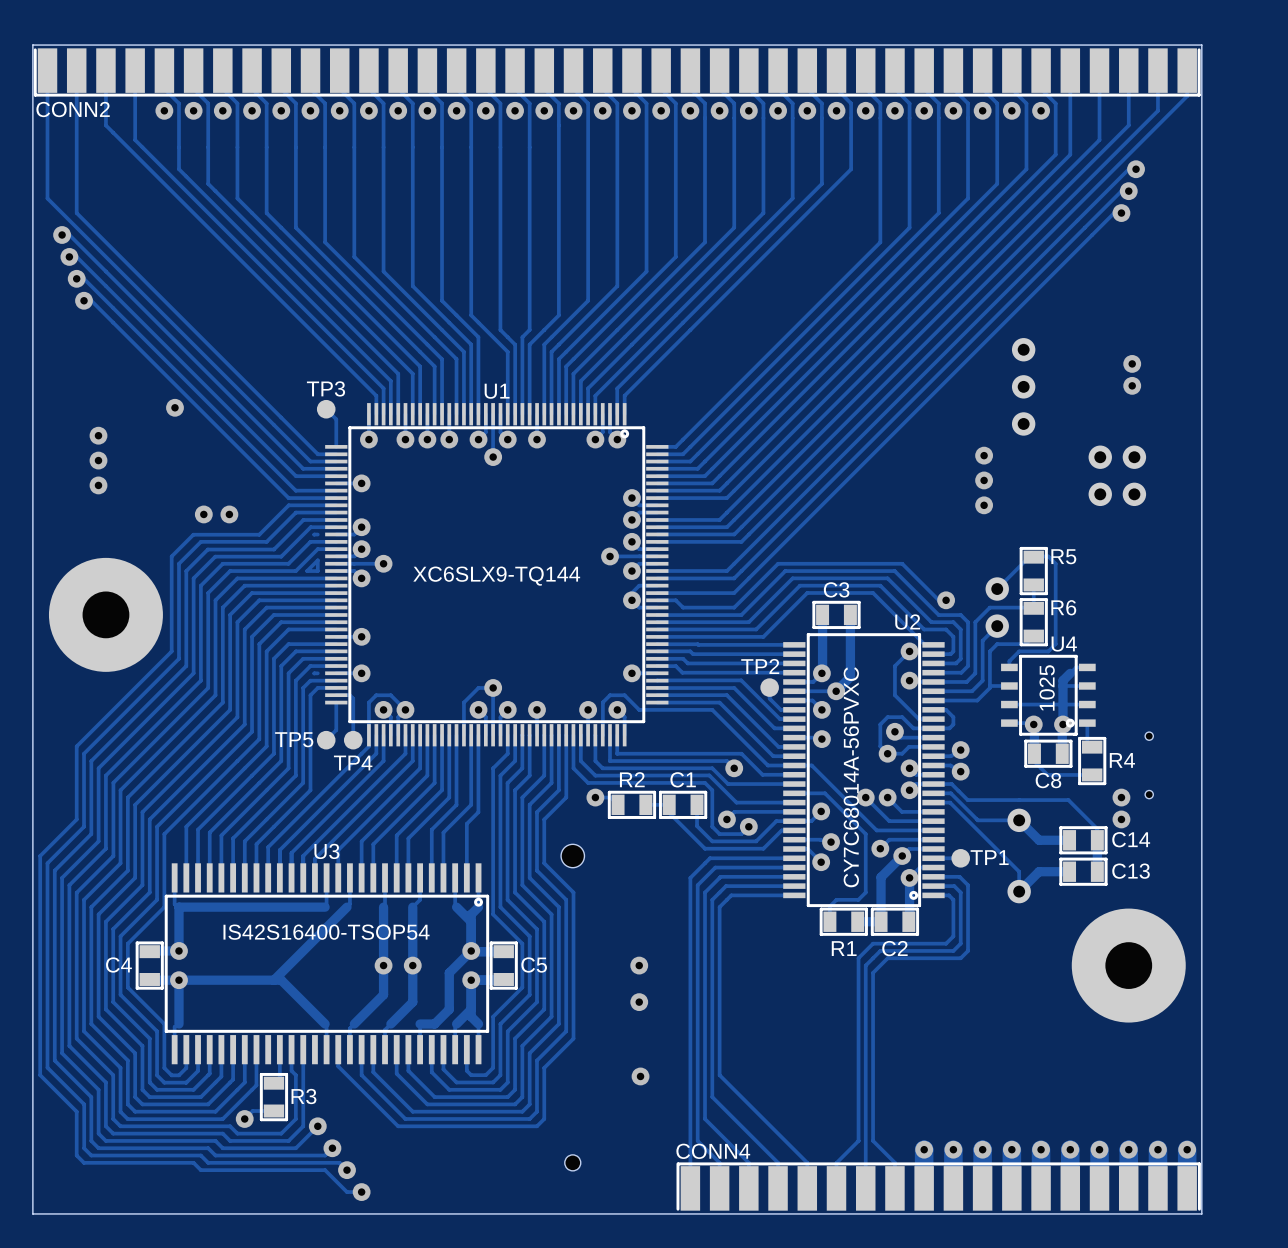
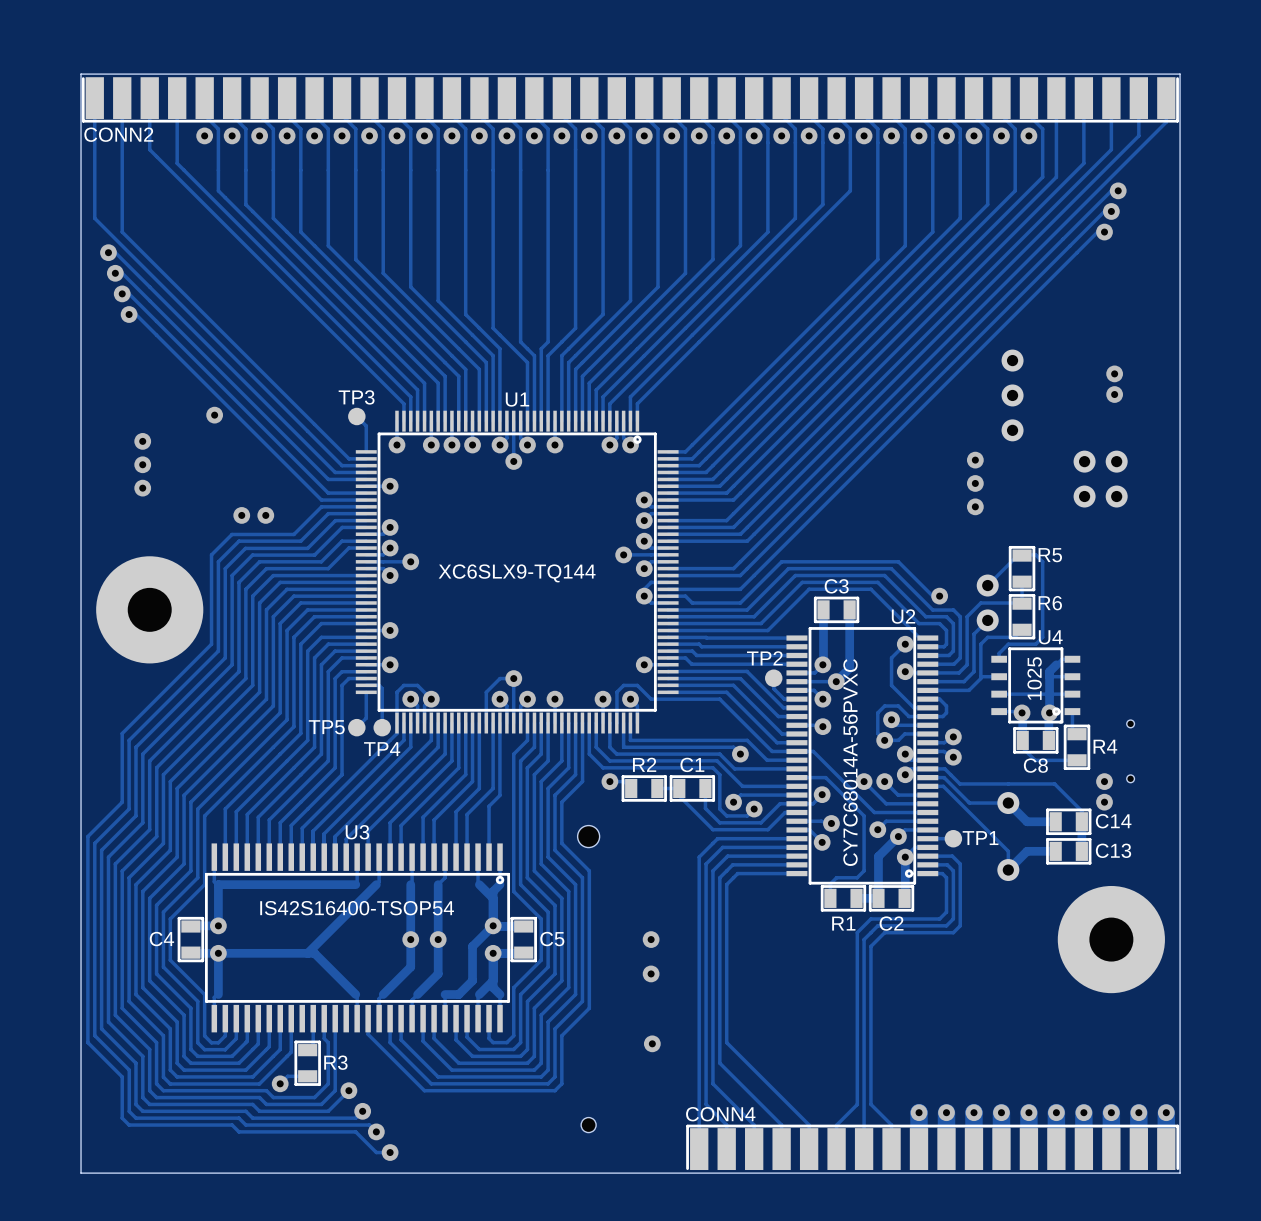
track: (314, 534) (317, 534) -> none
track: (317, 560) (317, 571) (307, 571) (317, 560) -> none
track: (317, 673) (314, 673) -> none

